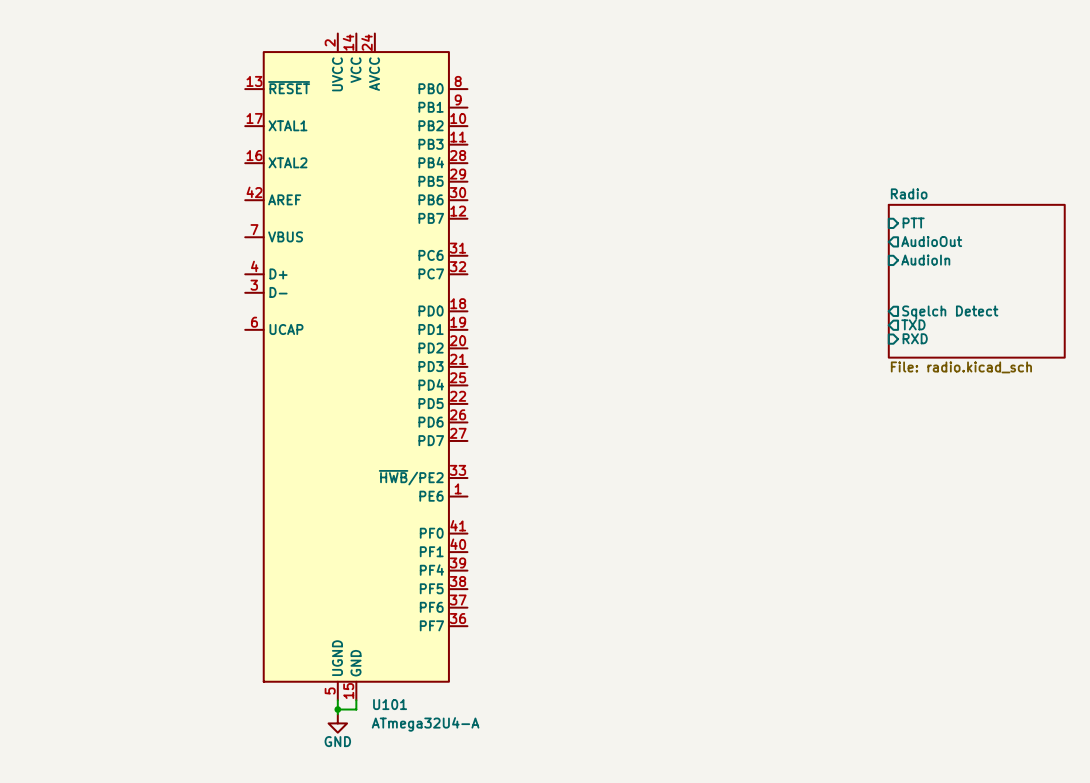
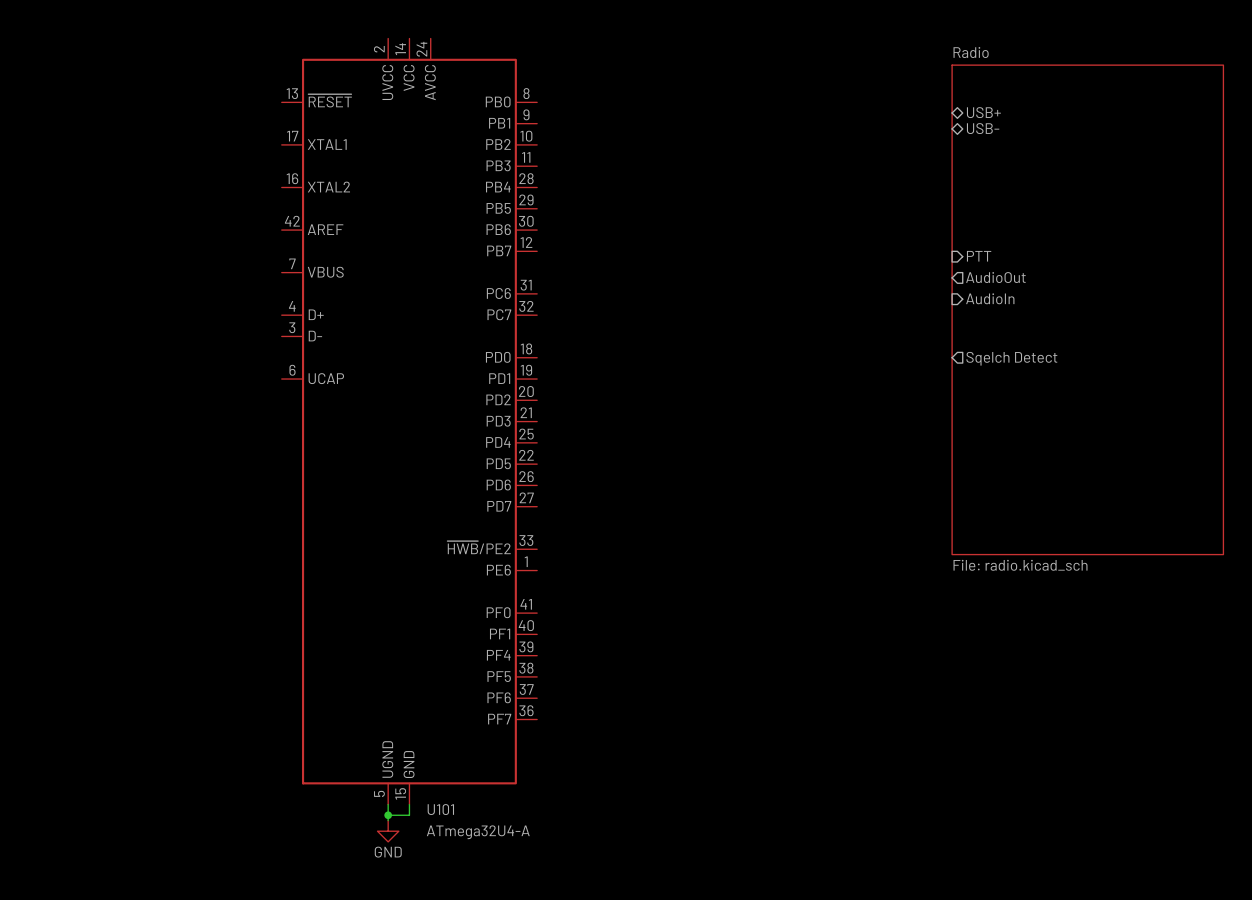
sheet pin: none -> USB+ (983, 112)
sheet pin: none -> USB- (983, 128)
sheet pin position: PTT (913, 223) -> PTT (979, 256)
sheet pin position: AudioOut (931, 241) -> AudioOut (995, 277)
sheet pin position: AudioIn (925, 260) -> AudioIn (990, 298)
sheet Radio: none -> File: radio.kicad_sch (1087, 309)
sheet Radio: File: radio.kicad_sch (976, 281) -> none
sheet pin position: Sqelch Detect (950, 312) -> Sqelch Detect (1011, 358)
sheet pin: TXD (913, 324) -> none
sheet pin: RXD (915, 338) -> none

